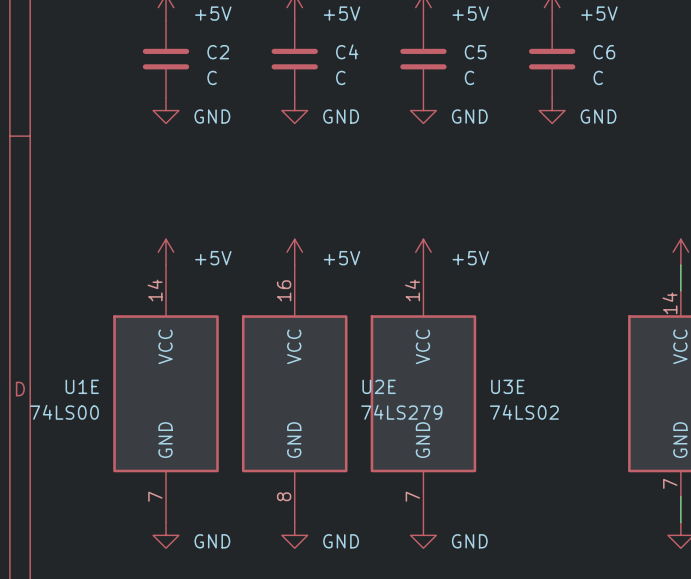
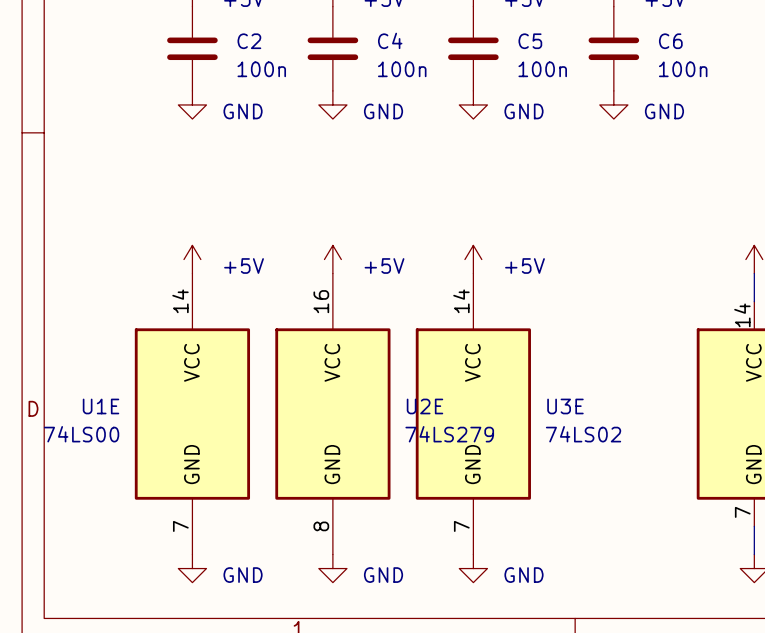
C2 value: C (212, 77) -> 100n (261, 69)
C4 value: C (340, 77) -> 100n (402, 69)
C5 value: C (469, 77) -> 100n (542, 69)
C6 value: C (598, 77) -> 100n (683, 69)

